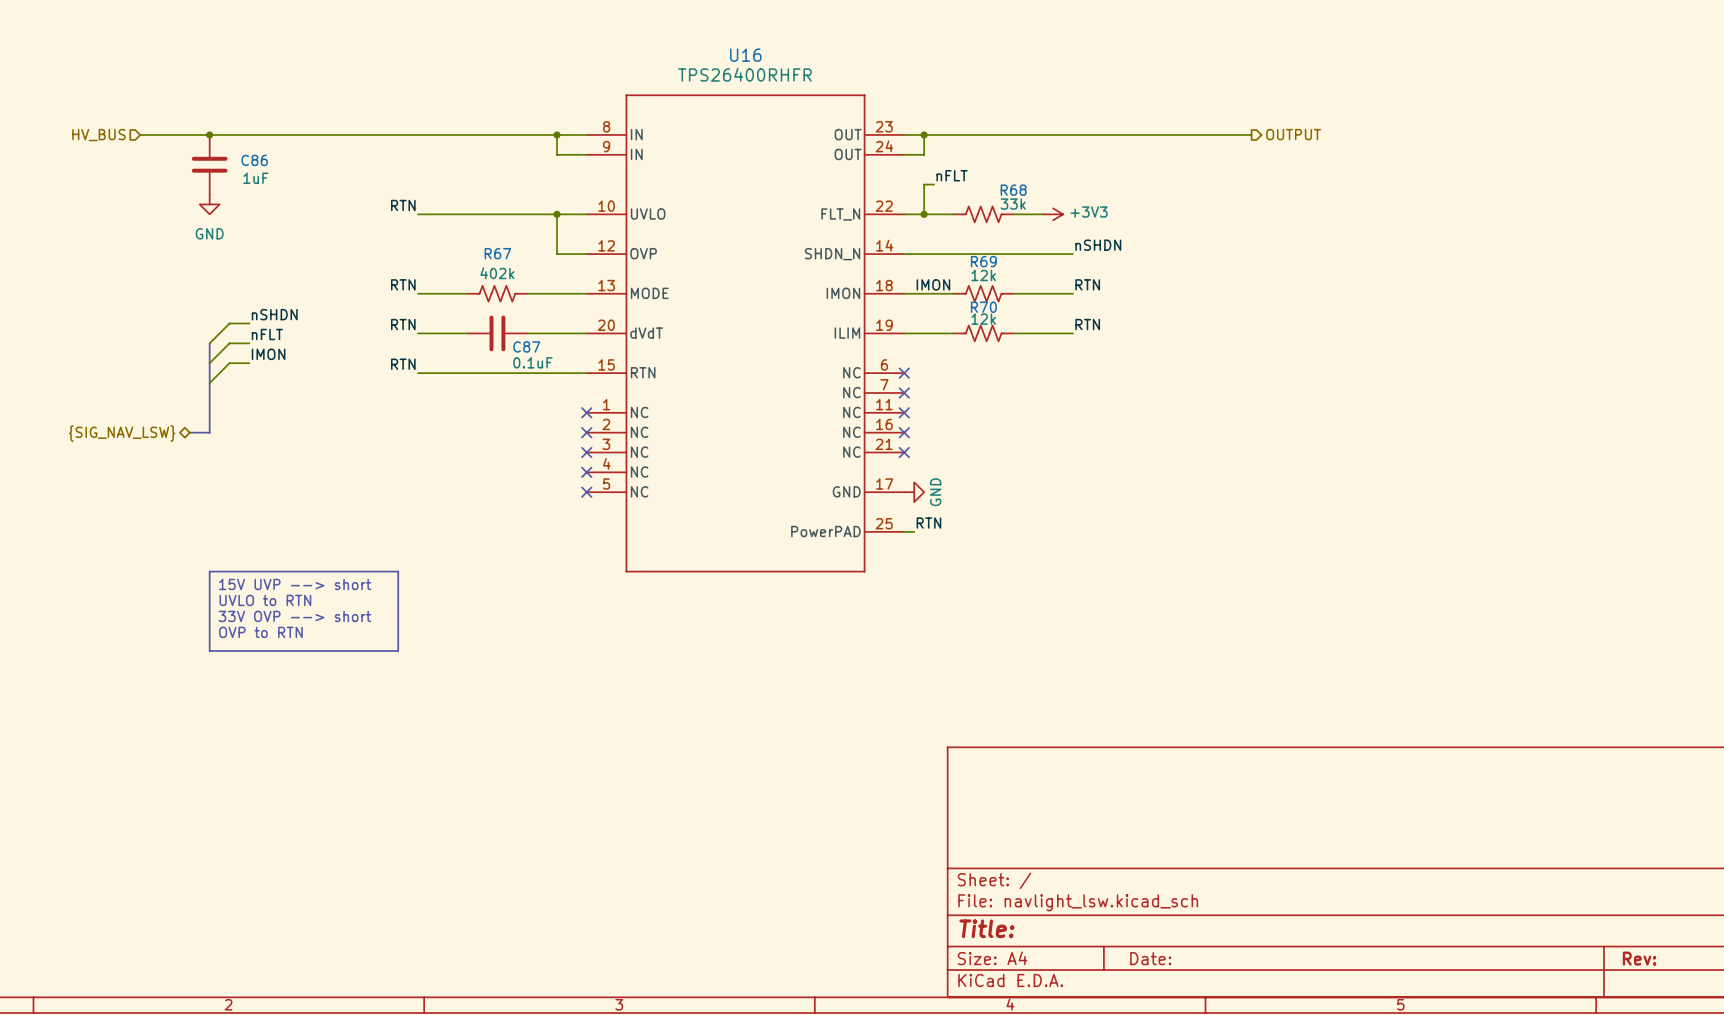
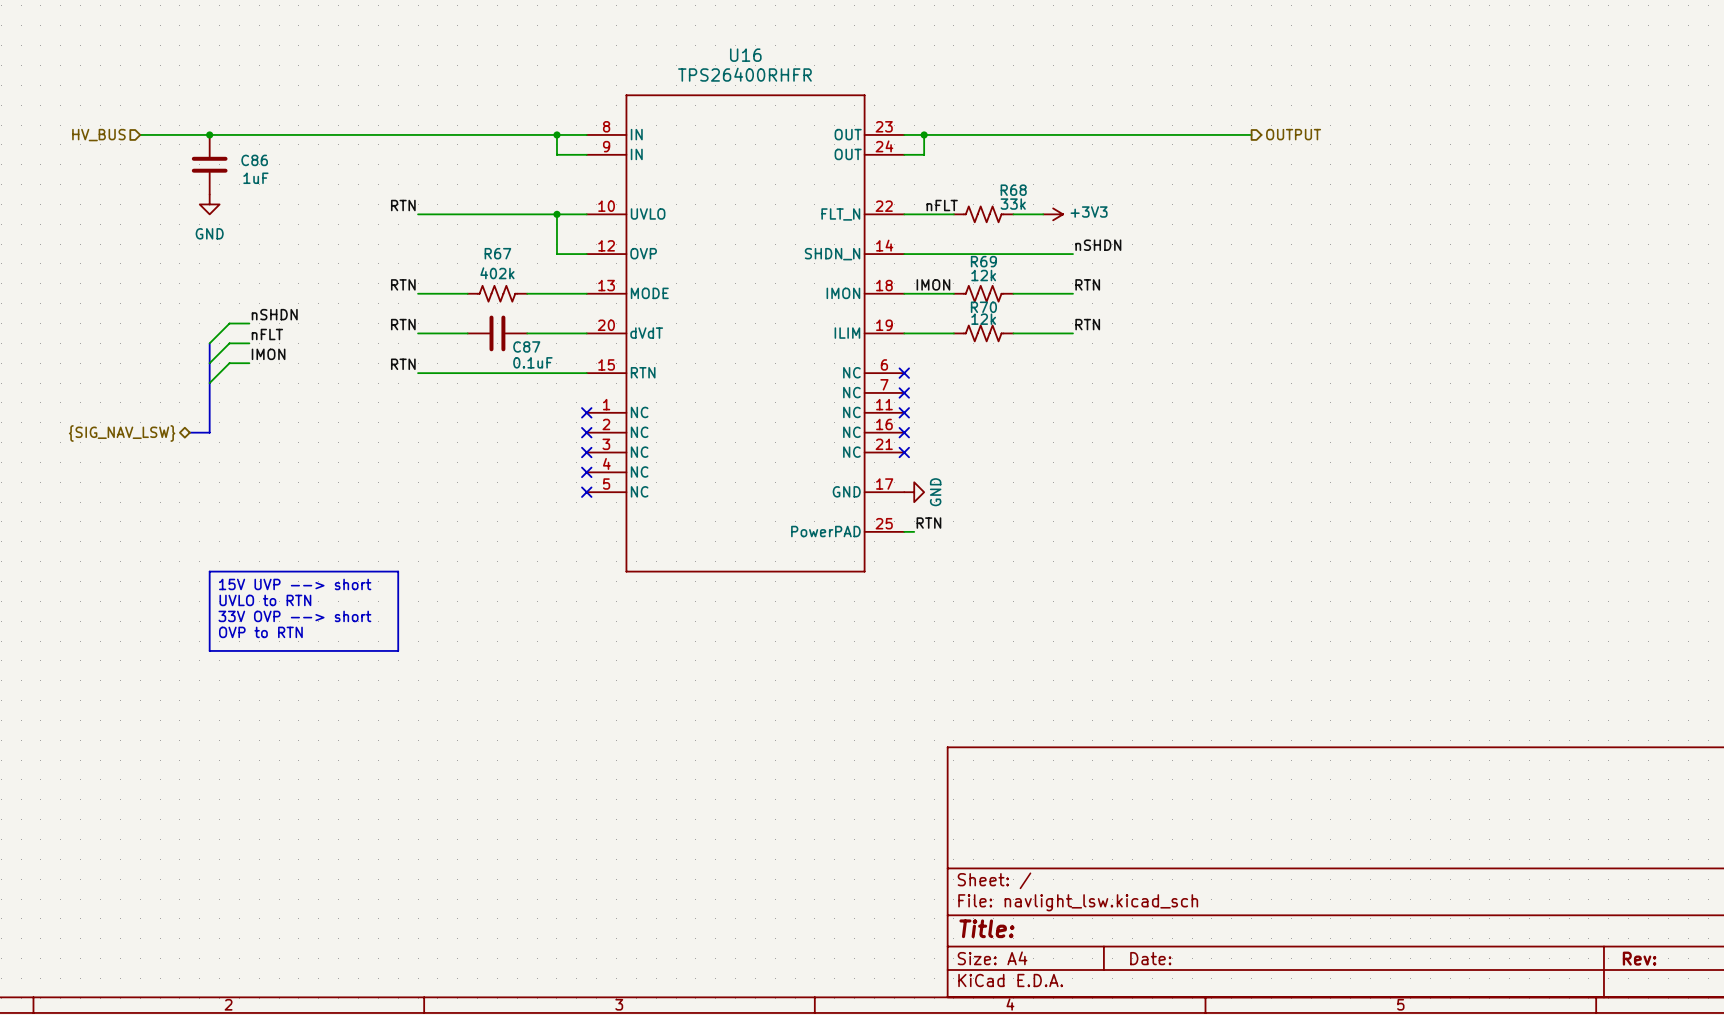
label position: nFLT (952, 175) -> nFLT (942, 205)
wire: (934, 184) (924, 184) (924, 214) -> none
junction: (924, 214) -> none

